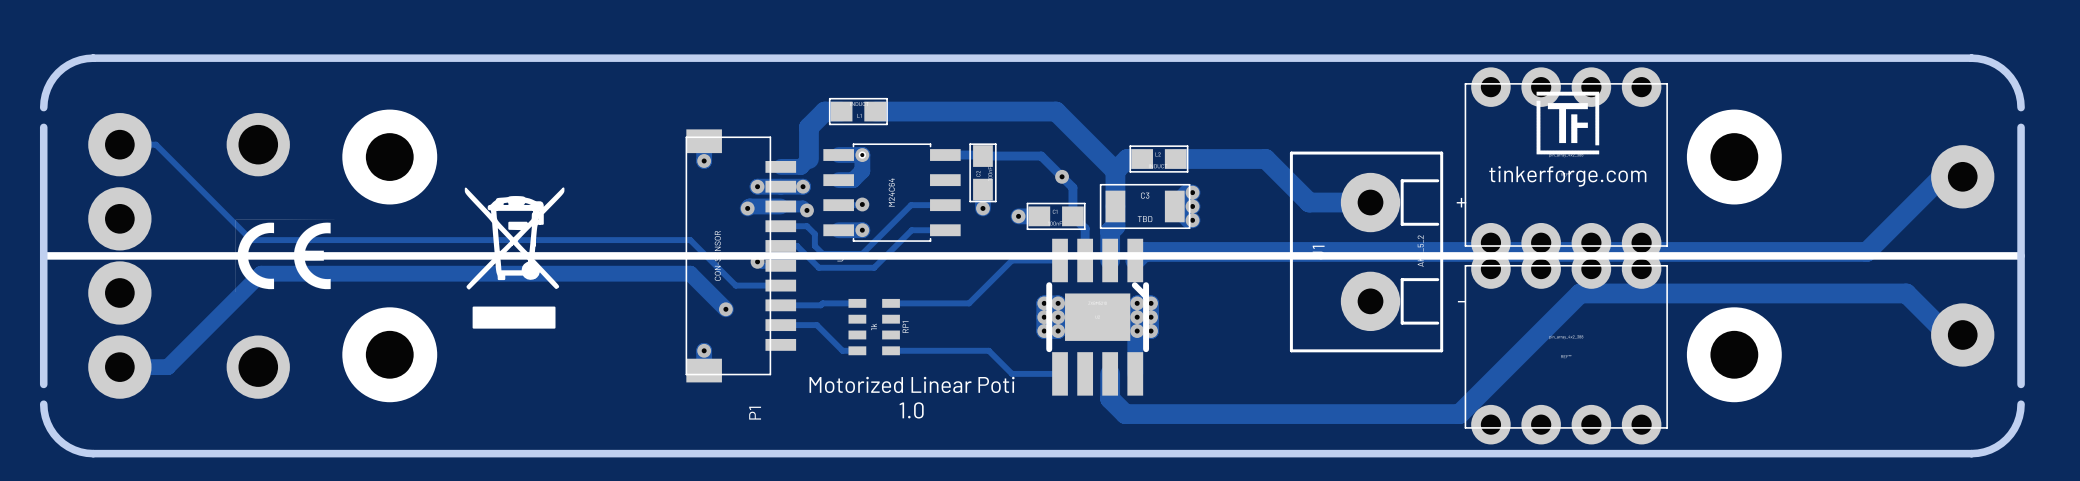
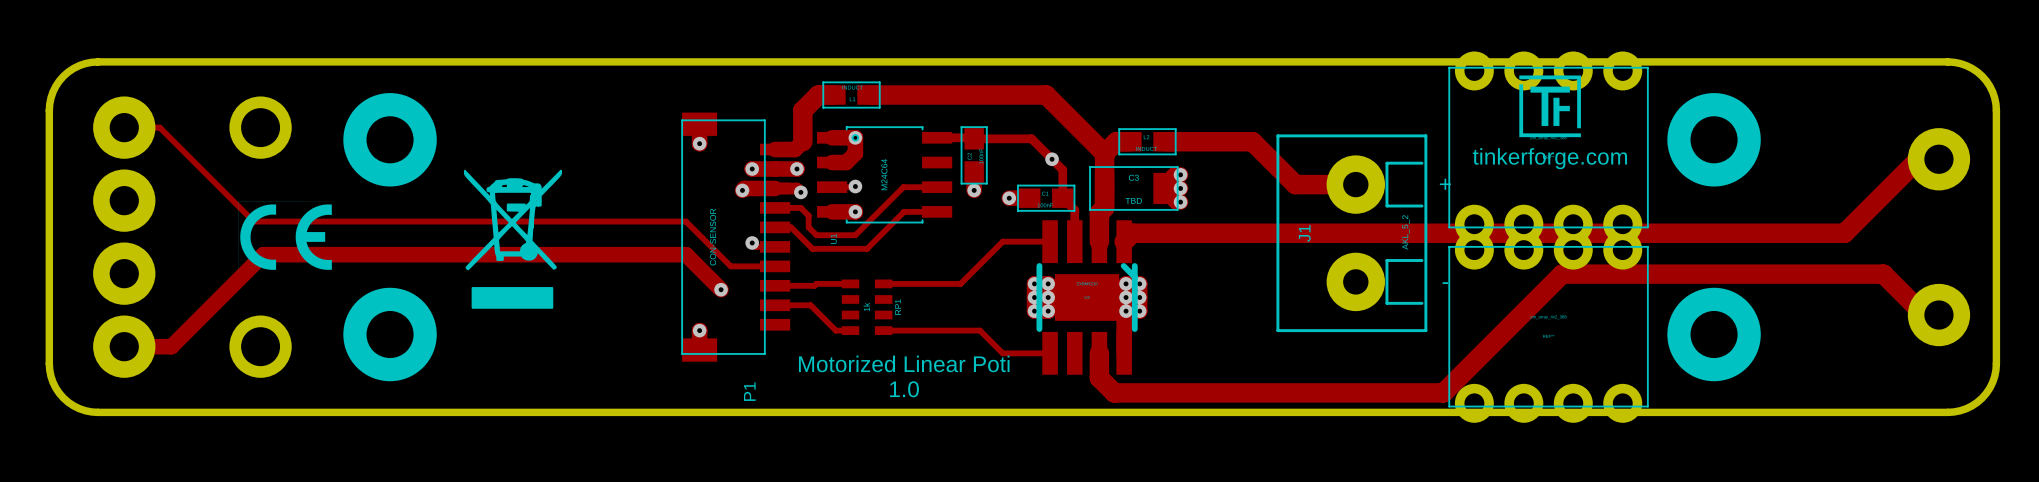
board edge: (43, 107) (47, 88) (58, 72) (74, 61) (93, 58) (1971, 58) (1990, 61) (2006, 72) (2017, 88) (2021, 107) -> (49, 110) (53, 91) (63, 76) (79, 65) (97, 61) (1947, 61) (1966, 65) (1982, 76) (1992, 91) (1996, 110)
line: (43, 255) (2021, 255) -> none
board edge: (43, 404) (47, 423) (58, 439) (74, 449) (93, 453) (1971, 453) (1990, 449) (2006, 439) (2017, 423) (2021, 404) -> (49, 363) (53, 382) (63, 398) (79, 408) (97, 412) (1947, 412) (1966, 408) (1982, 398) (1992, 382) (1996, 363)

